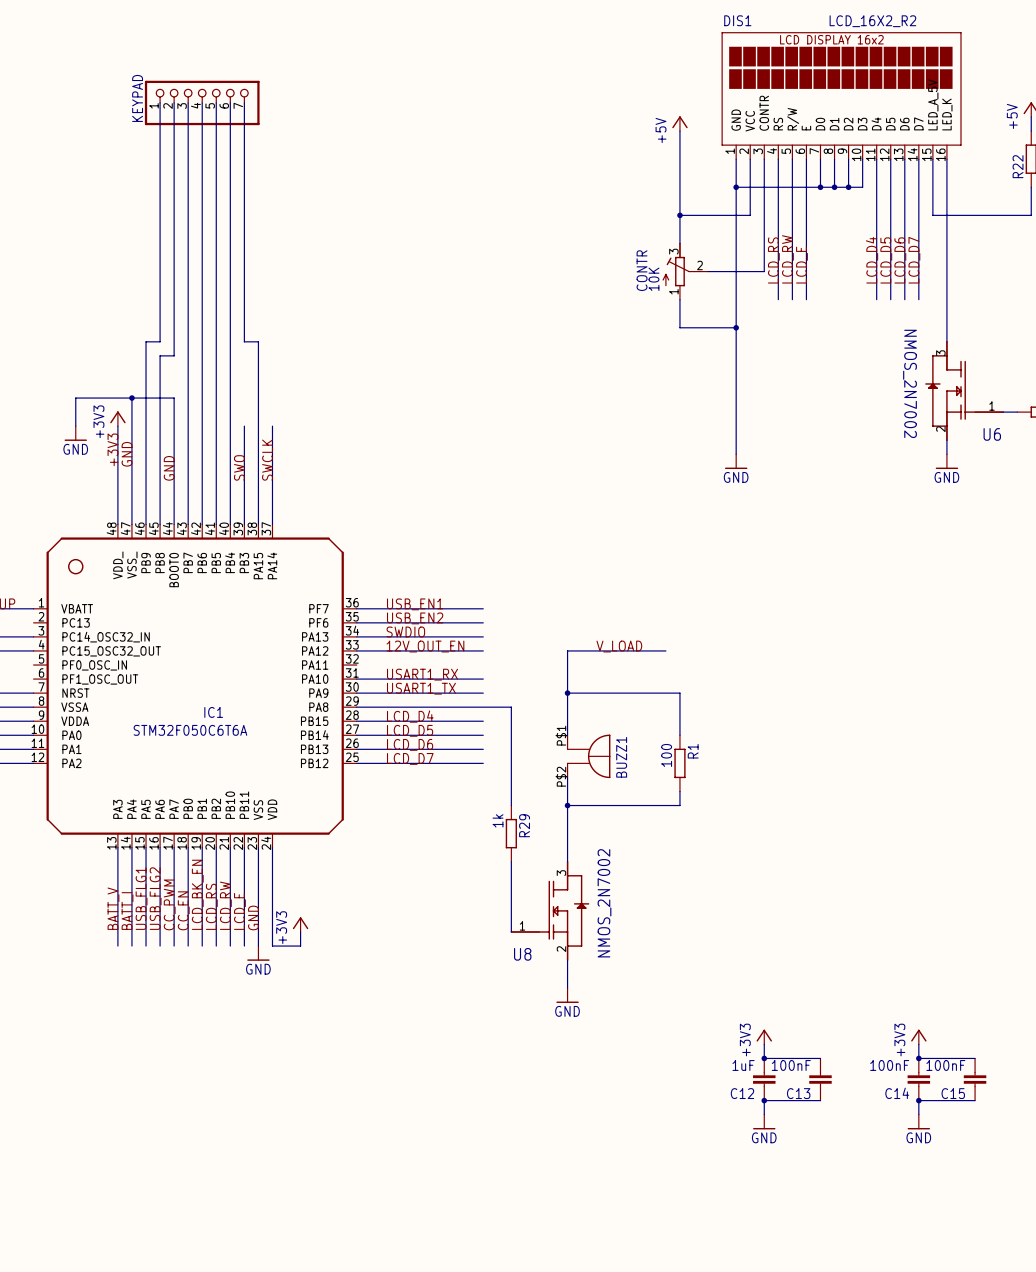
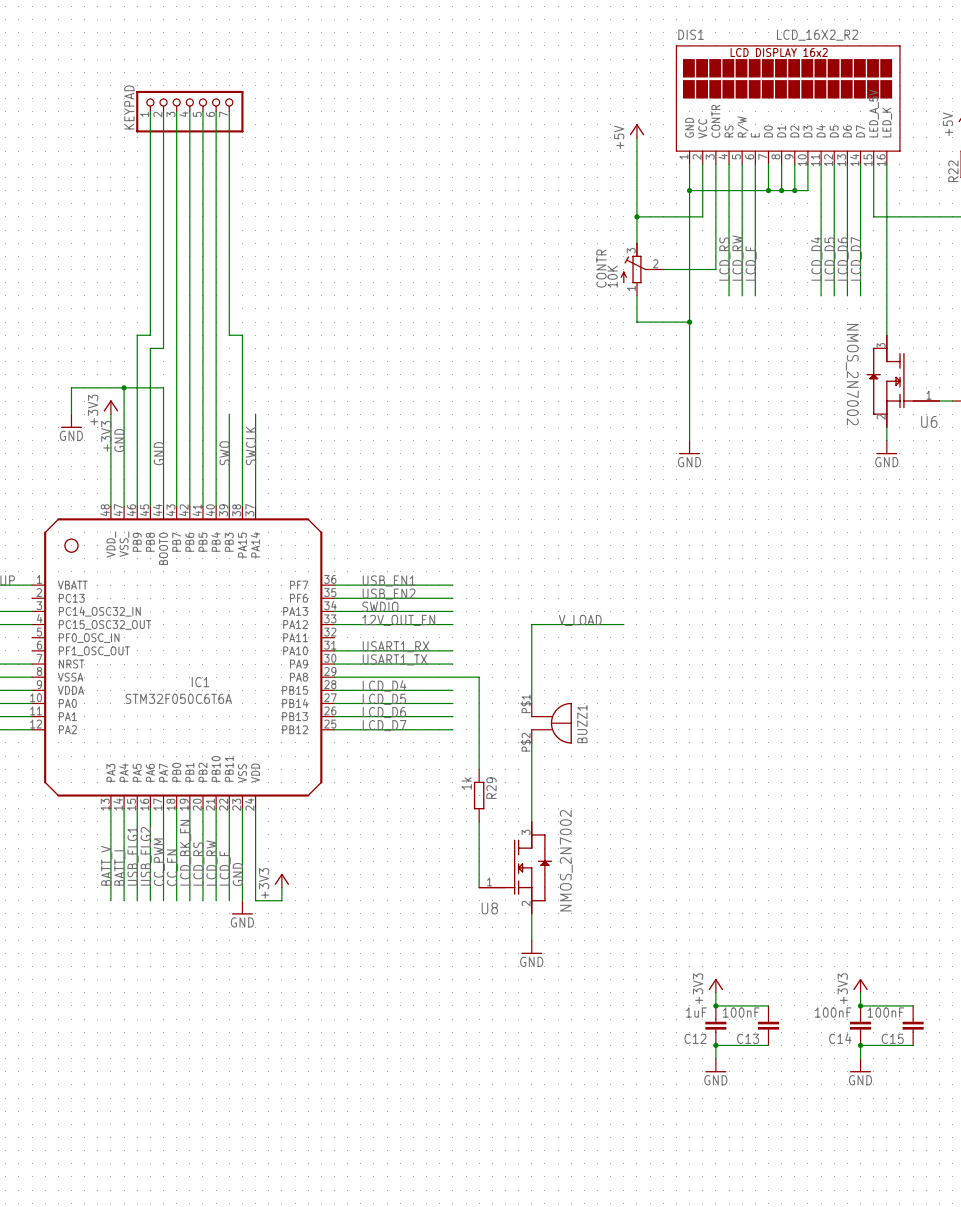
wire: (567, 693) (679, 693) (679, 735) -> none
junction: (567, 693) -> none
R1: 100 (679, 763) -> none
wire: (679, 791) (679, 805) (567, 805) -> none
junction: (567, 805) -> none

